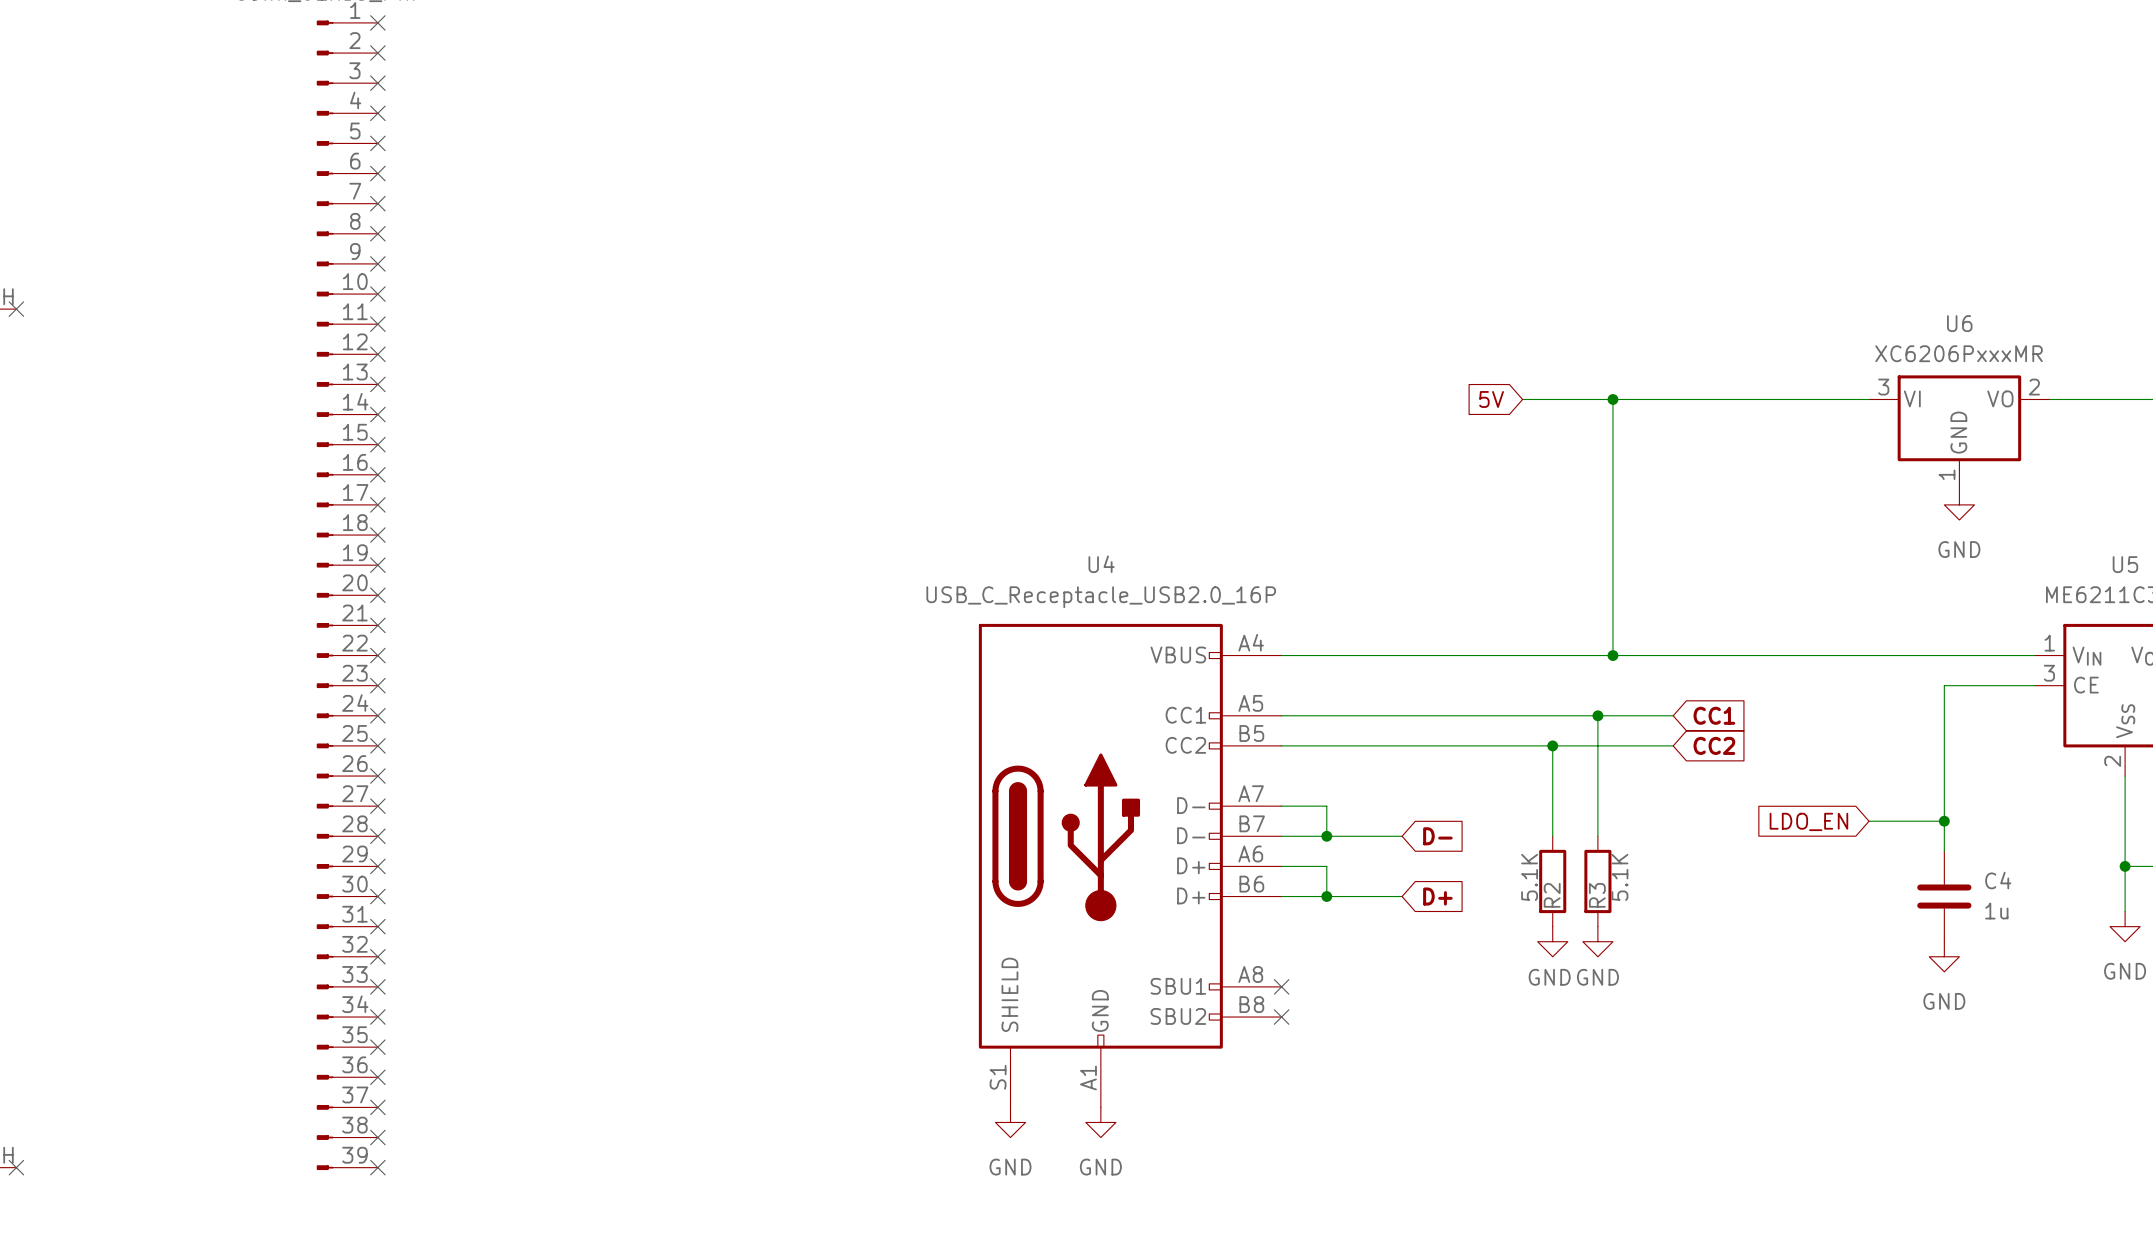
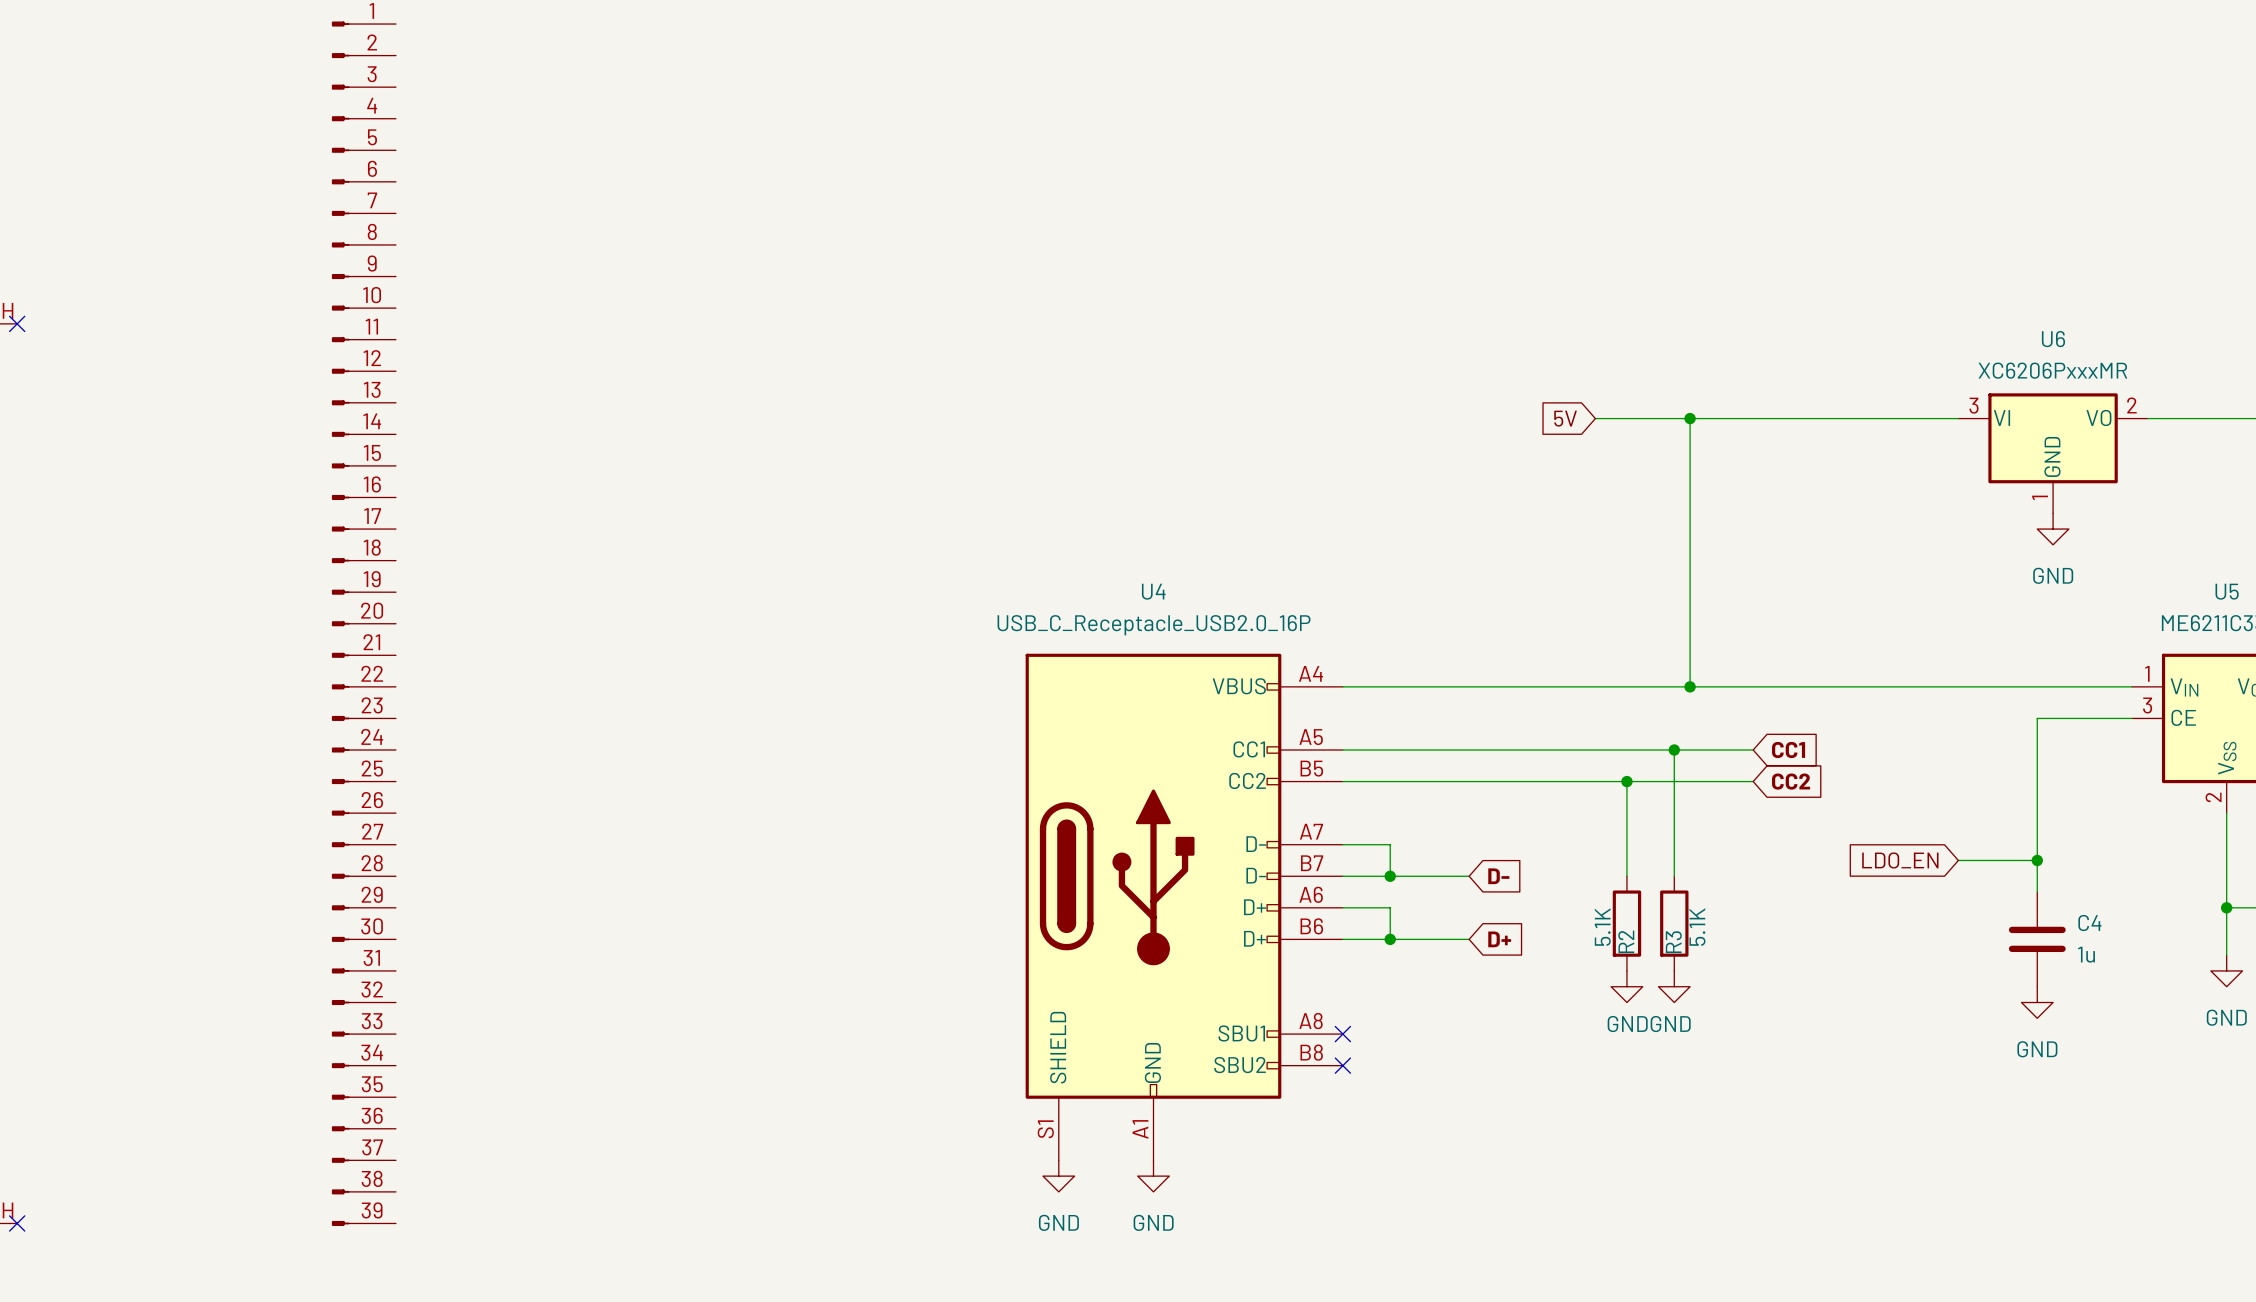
no-connect mark: (377, 22) -> none
no-connect mark: (377, 53) -> none
no-connect mark: (377, 83) -> none
no-connect mark: (377, 113) -> none
no-connect mark: (377, 143) -> none
no-connect mark: (377, 173) -> none
no-connect mark: (377, 203) -> none
no-connect mark: (377, 233) -> none
no-connect mark: (377, 263) -> none
no-connect mark: (377, 294) -> none
no-connect mark: (377, 324) -> none
no-connect mark: (377, 354) -> none
no-connect mark: (377, 384) -> none
no-connect mark: (377, 414) -> none
no-connect mark: (377, 444) -> none
no-connect mark: (377, 474) -> none
no-connect mark: (377, 504) -> none
no-connect mark: (377, 535) -> none
no-connect mark: (377, 565) -> none
no-connect mark: (377, 595) -> none
no-connect mark: (377, 625) -> none
no-connect mark: (377, 655) -> none
no-connect mark: (377, 685) -> none
no-connect mark: (377, 715) -> none
no-connect mark: (377, 745) -> none
no-connect mark: (377, 776) -> none
no-connect mark: (377, 806) -> none
no-connect mark: (377, 836) -> none
no-connect mark: (377, 866) -> none
no-connect mark: (377, 896) -> none
no-connect mark: (377, 926) -> none
no-connect mark: (377, 956) -> none
no-connect mark: (377, 986) -> none
no-connect mark: (377, 1017) -> none
no-connect mark: (377, 1047) -> none
no-connect mark: (377, 1077) -> none
no-connect mark: (377, 1107) -> none
no-connect mark: (377, 1137) -> none
no-connect mark: (377, 1167) -> none

